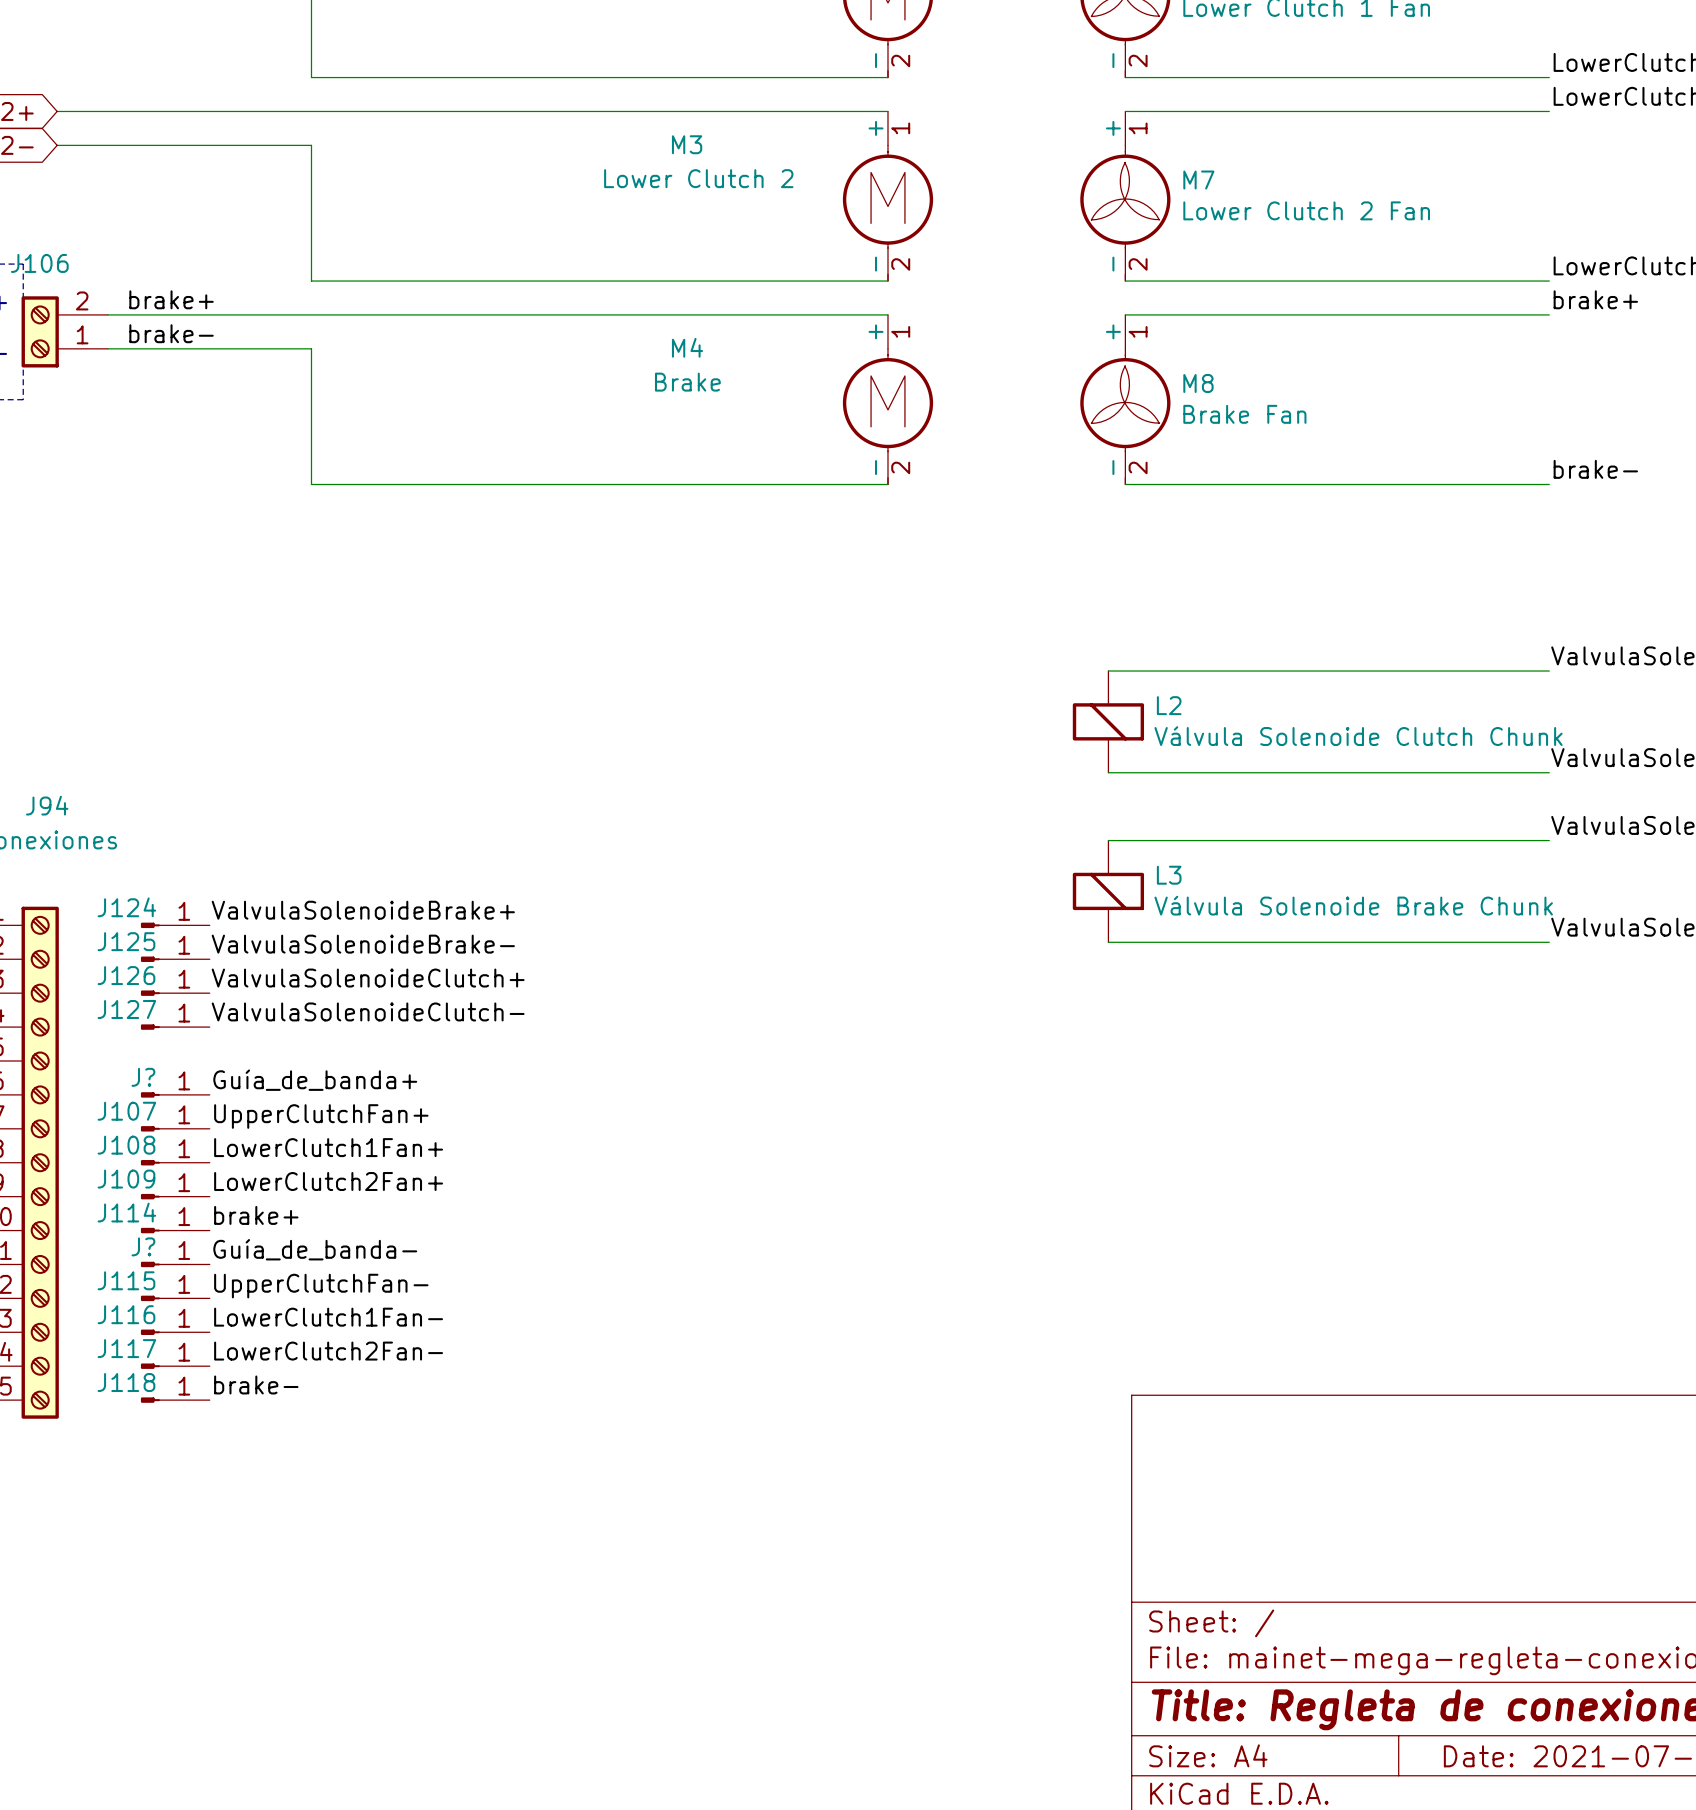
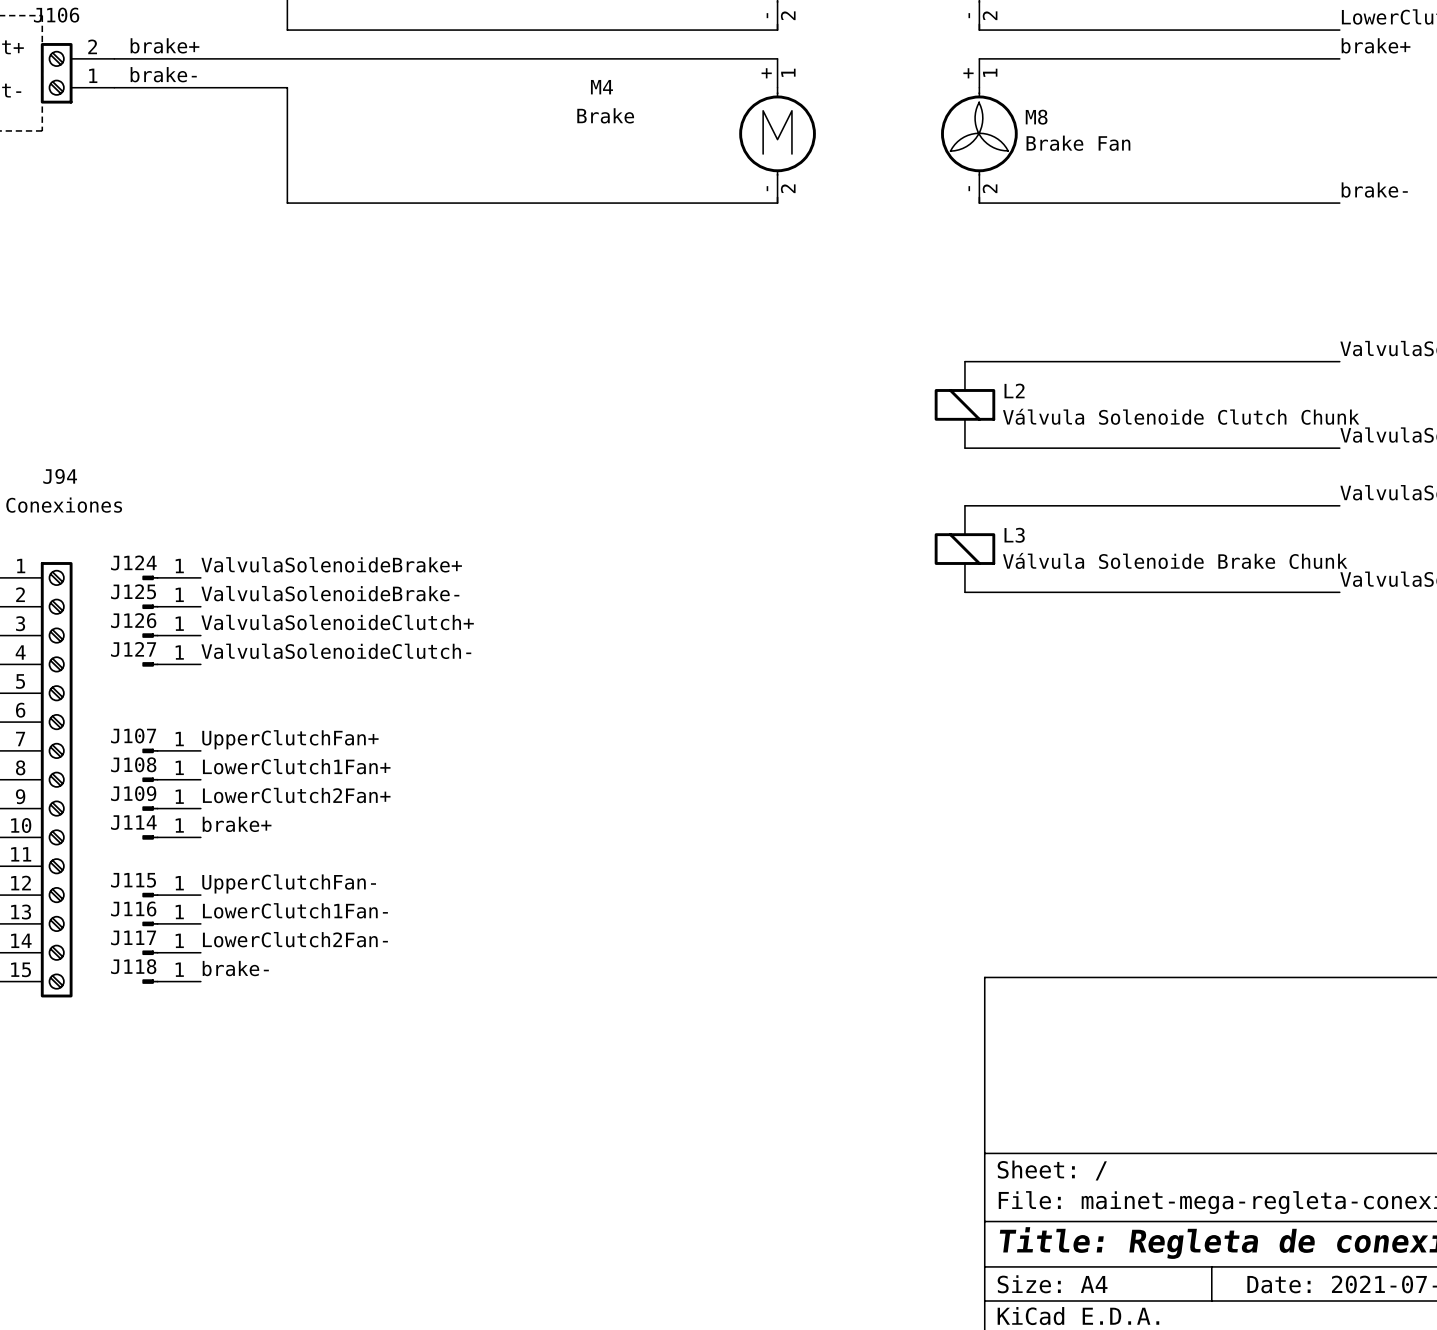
label: Guía_de_banda+ (315, 1080) -> none
J?: (175, 1094) -> none
label: Guía_de_banda- (315, 1249) -> none
J?: (175, 1264) -> none

